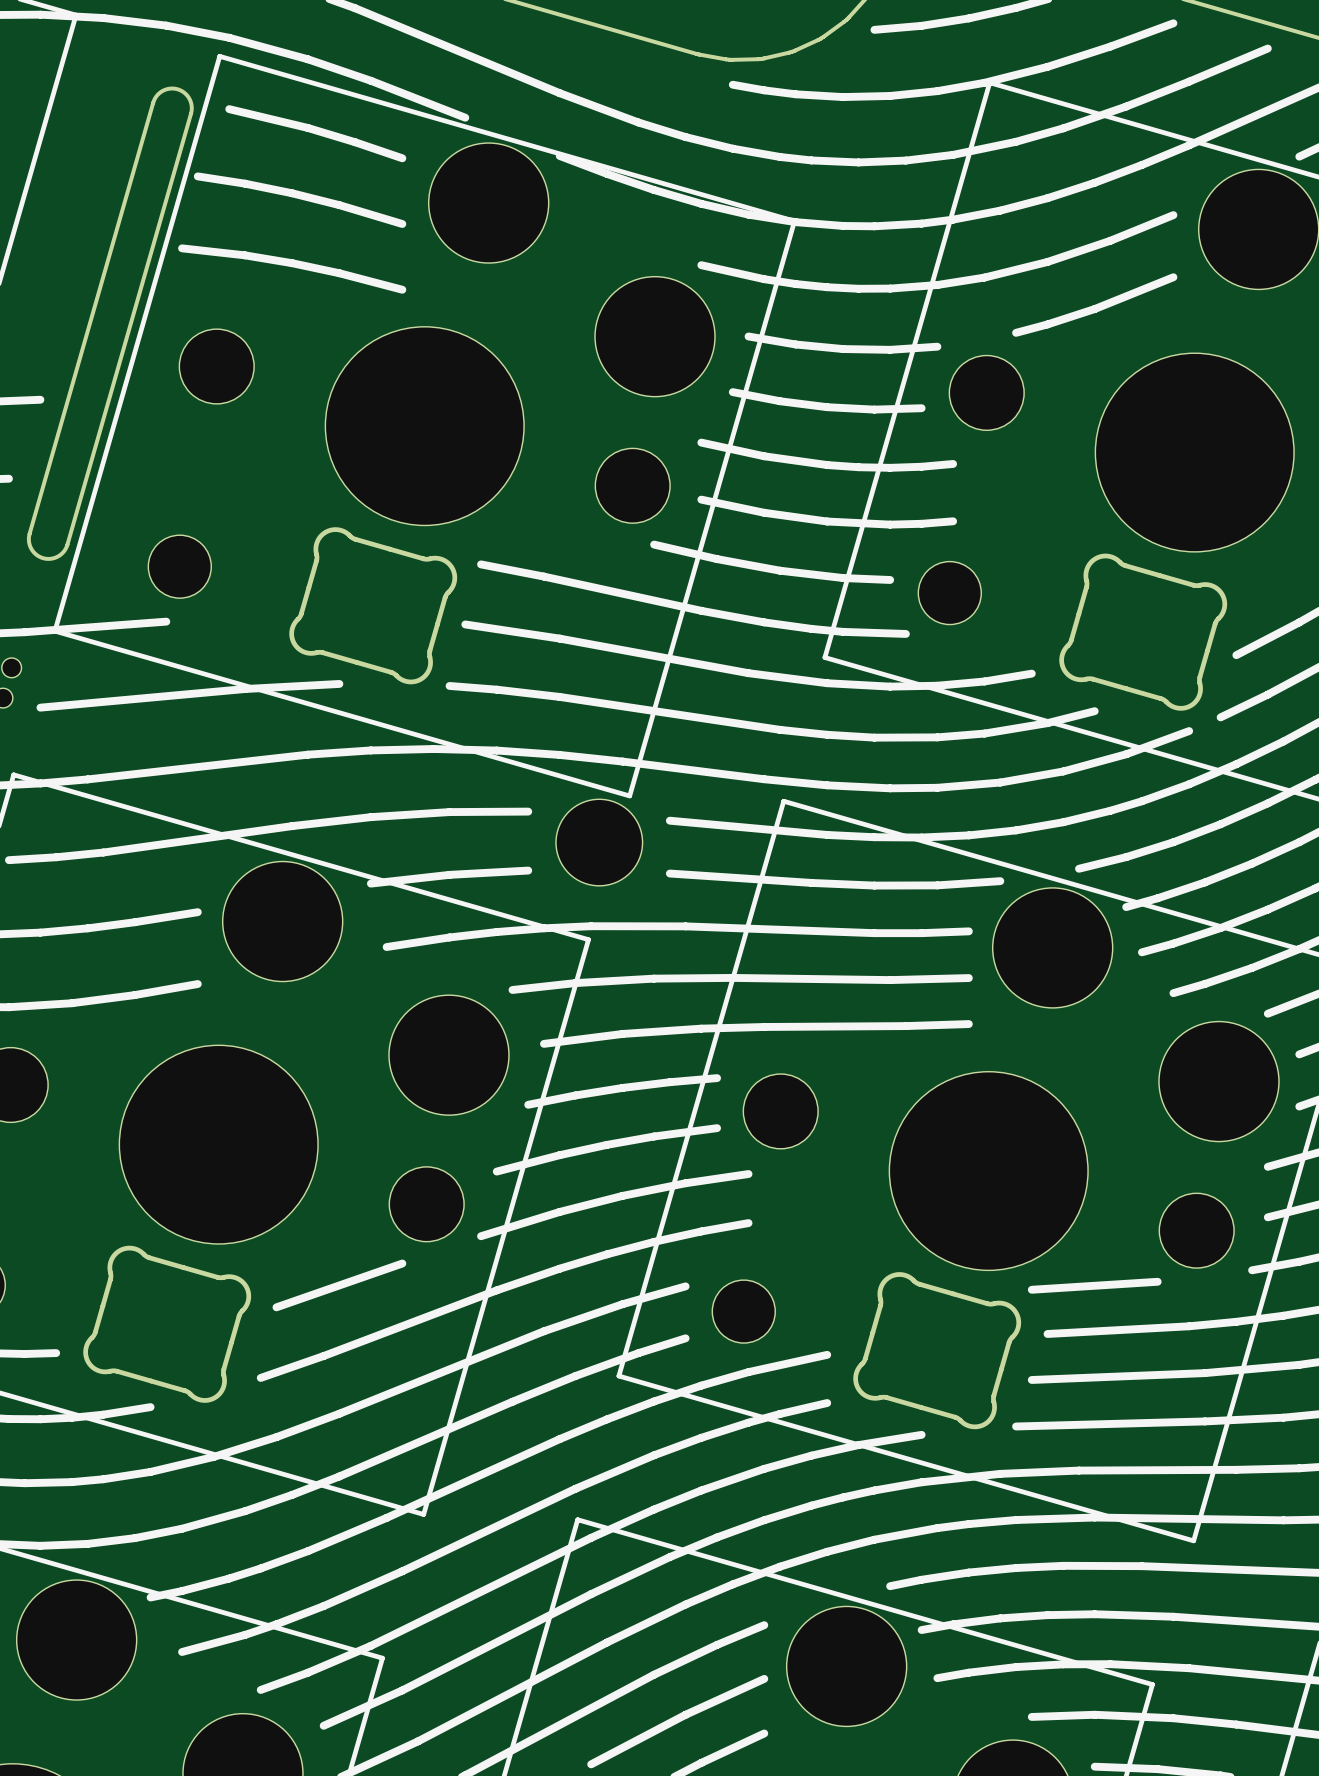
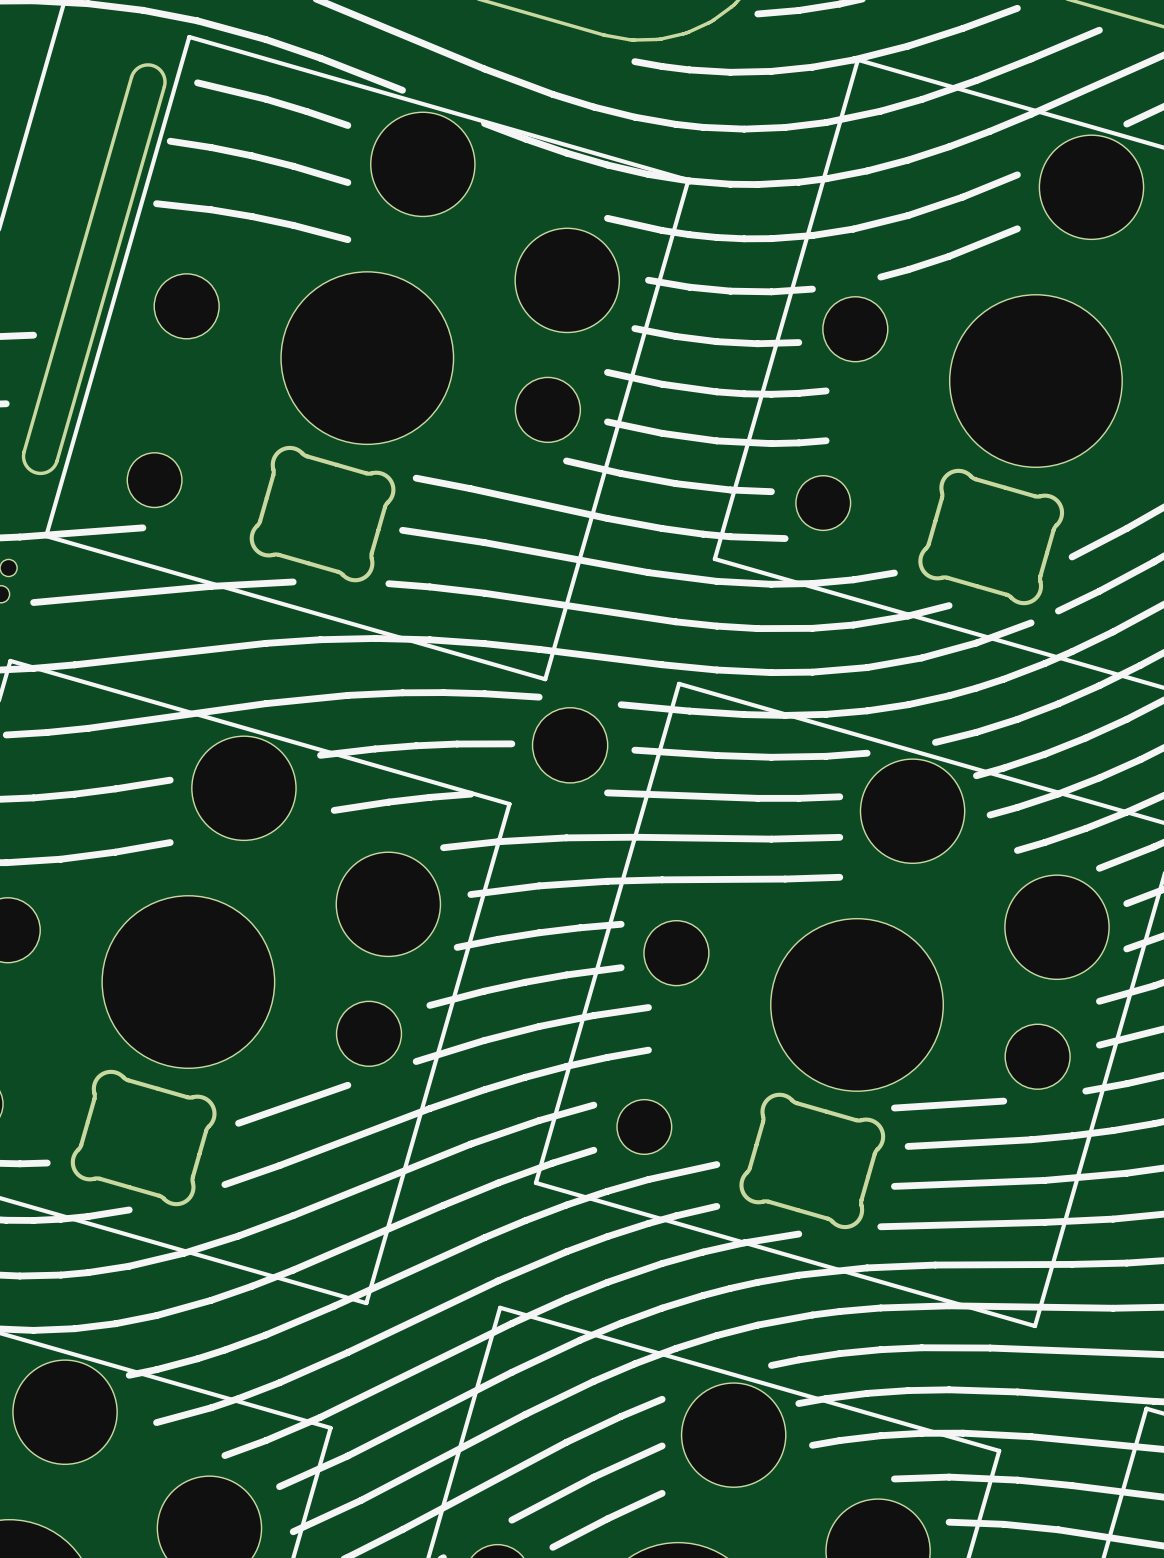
line: (1236, 764) (1189, 784) (1110, 810) (1063, 822) (1016, 830) (968, 835) (921, 837) (827, 834) (669, 820) -> (1072, 651) (976, 688) (908, 704) (867, 710) (826, 714) (744, 714) (621, 704)
line: (528, 811) (449, 812) (370, 817) (103, 852) -> (539, 697) (443, 692) (347, 695) (265, 703) (88, 728)
part position: (599, 842) -> (570, 745)
line: (528, 870) (449, 874) (370, 883) -> (511, 743) (416, 745) (320, 755)
line: (669, 873) (874, 885) (937, 885) (1000, 881) -> (634, 750) (771, 757) (867, 753)
line: (543, 928) (685, 926) (874, 933) -> (607, 792) (757, 798)

